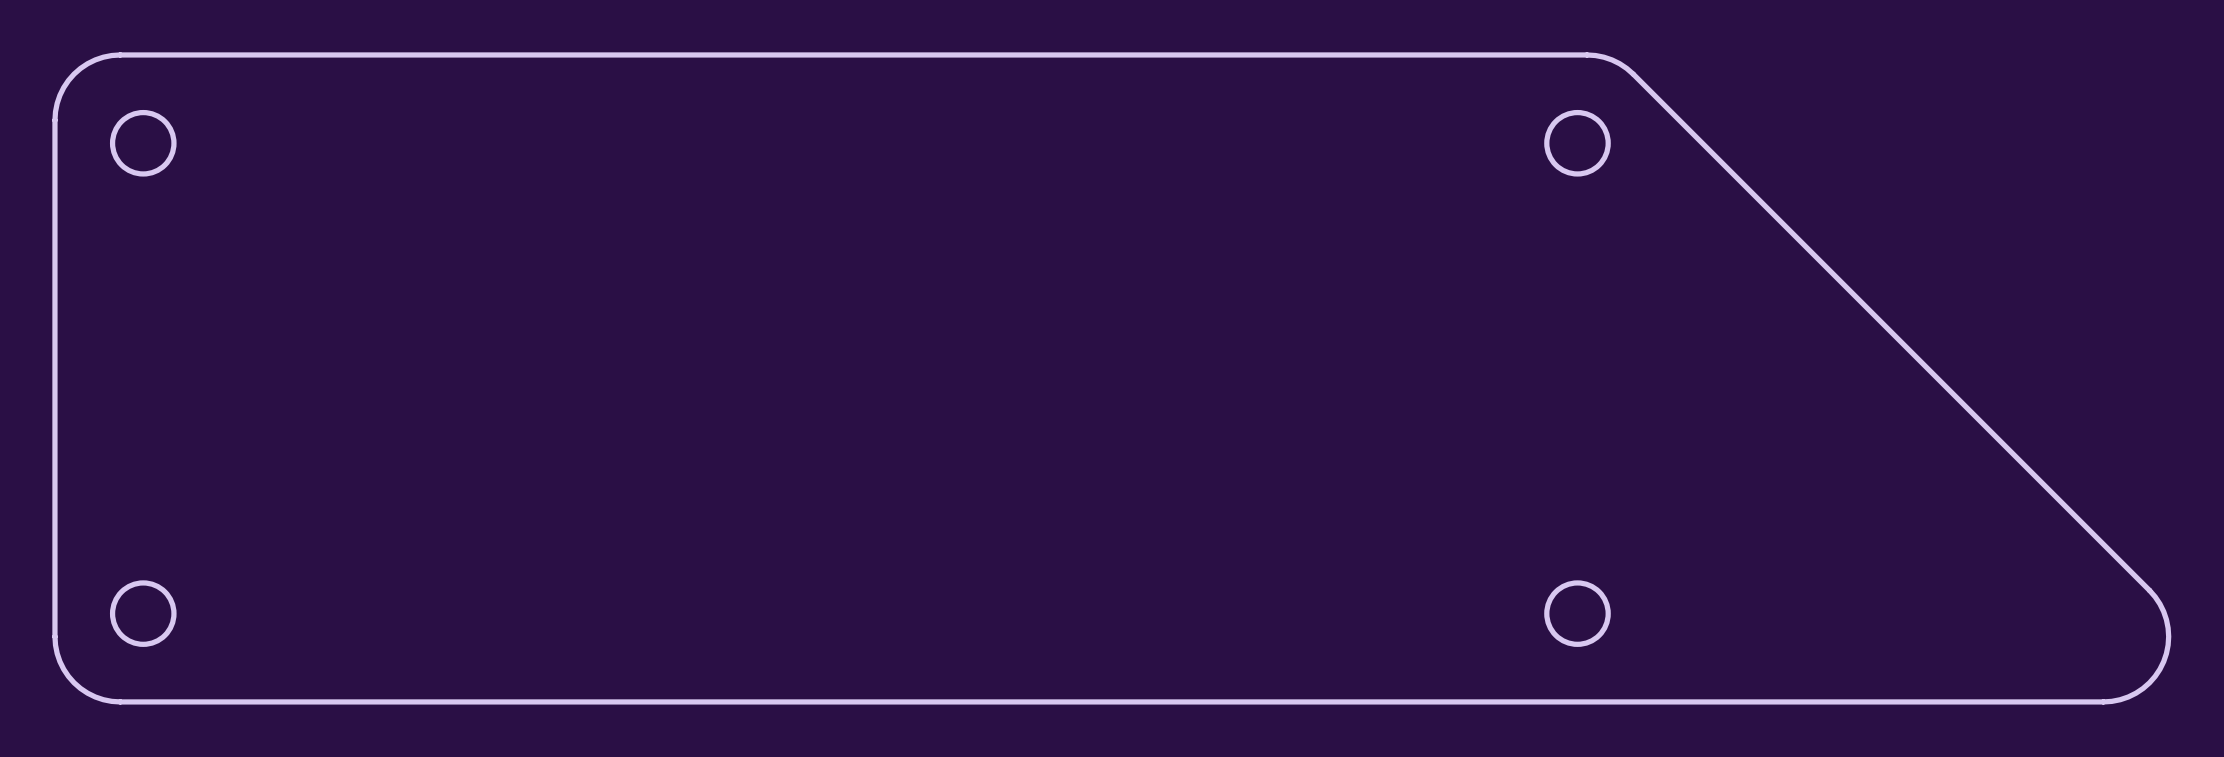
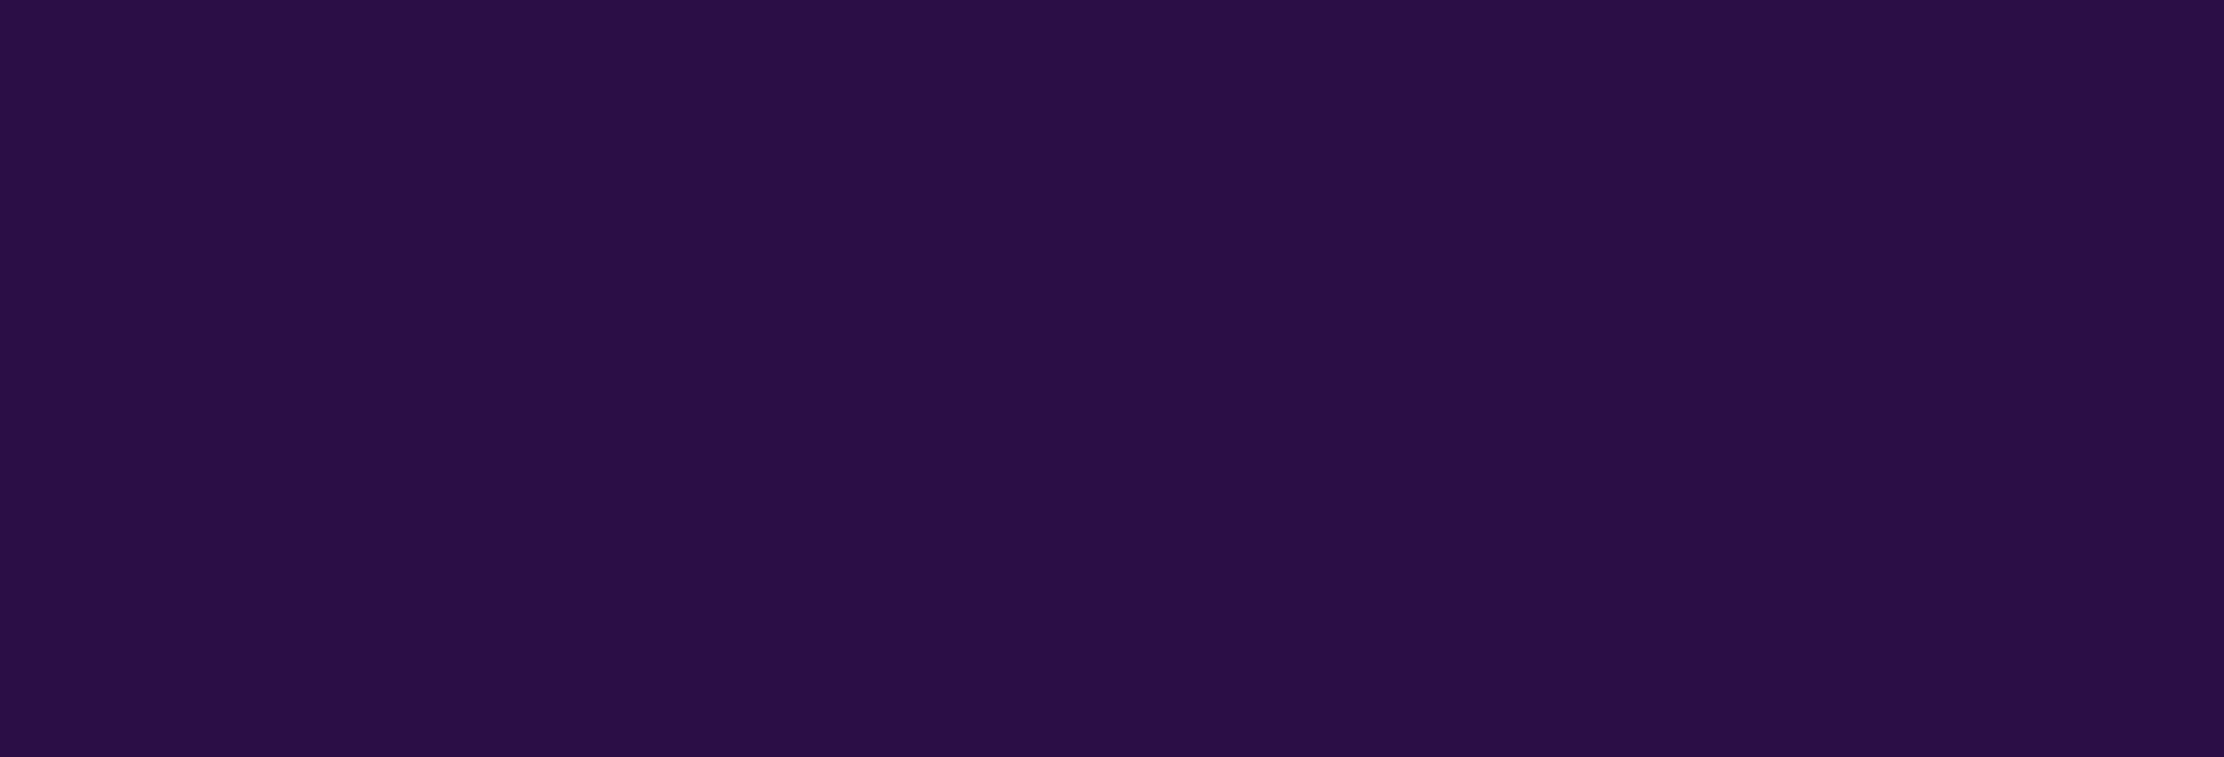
round board edge: [109, 109, 177, 177] -> none
round board edge: [1544, 109, 1611, 177] -> none
round board edge: [109, 580, 177, 647] -> none
round board edge: [1544, 580, 1611, 647] -> none
board edge: (2103, 701) (2120, 699) (2136, 693) (2155, 676) (2163, 661) (2168, 645) (2168, 628) (2163, 611) (2155, 596) (1633, 74) (1619, 63) (1603, 57) (1587, 54) (120, 54) (103, 57) (80, 68) (68, 80) (57, 103) (54, 120) (55, 645) (59, 661) (68, 676) (80, 688) (103, 699) (120, 701) (2103, 701) -> none

